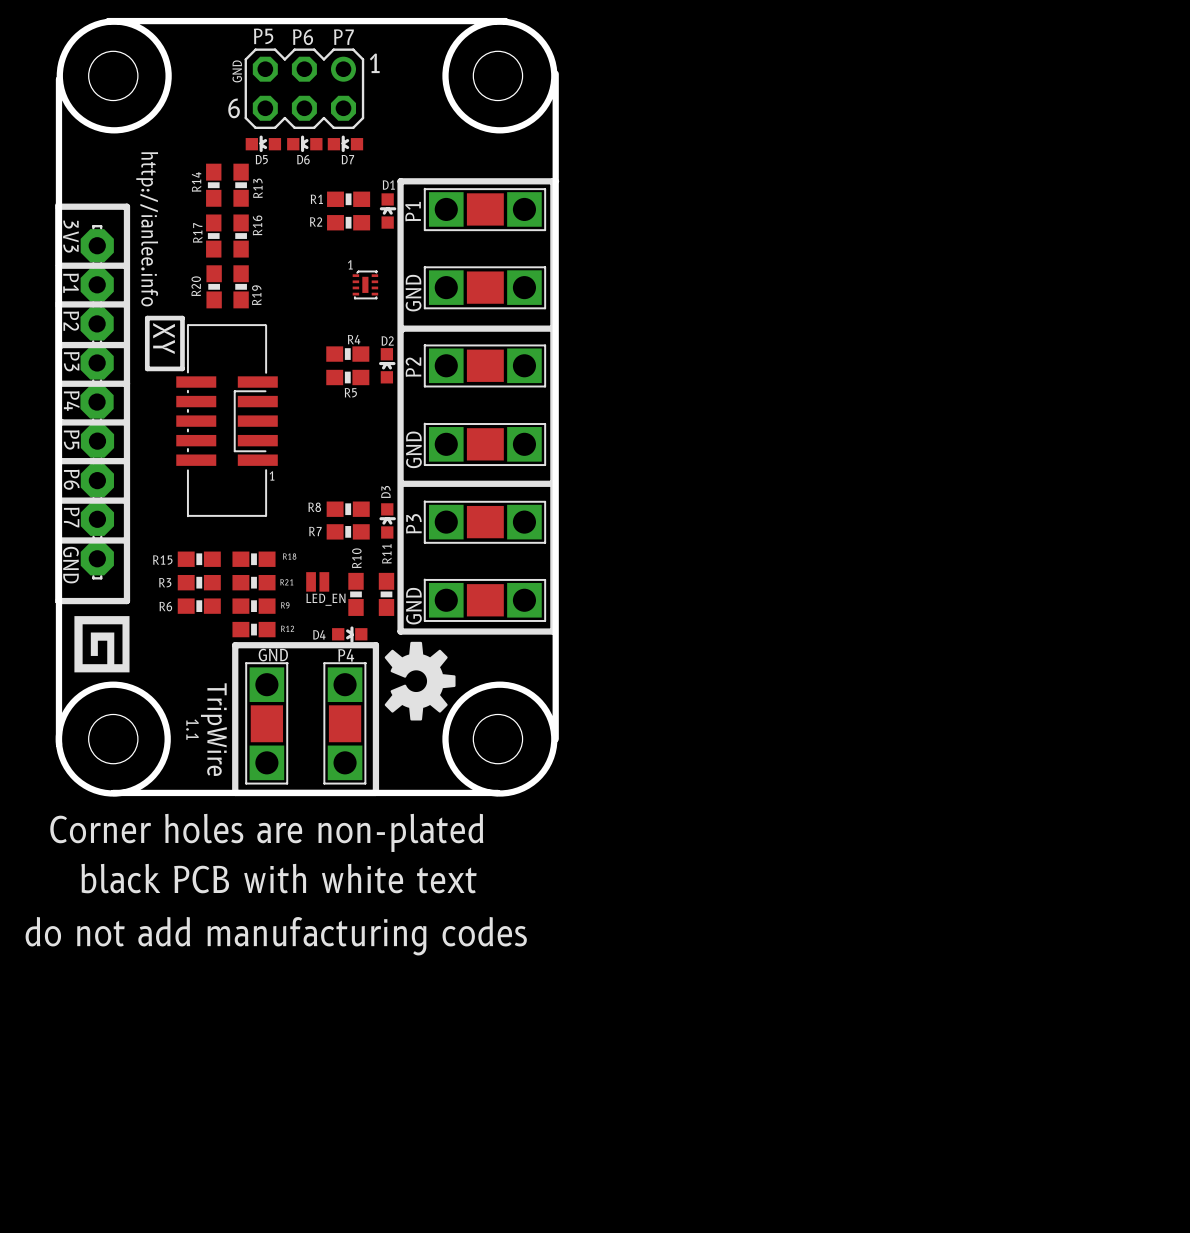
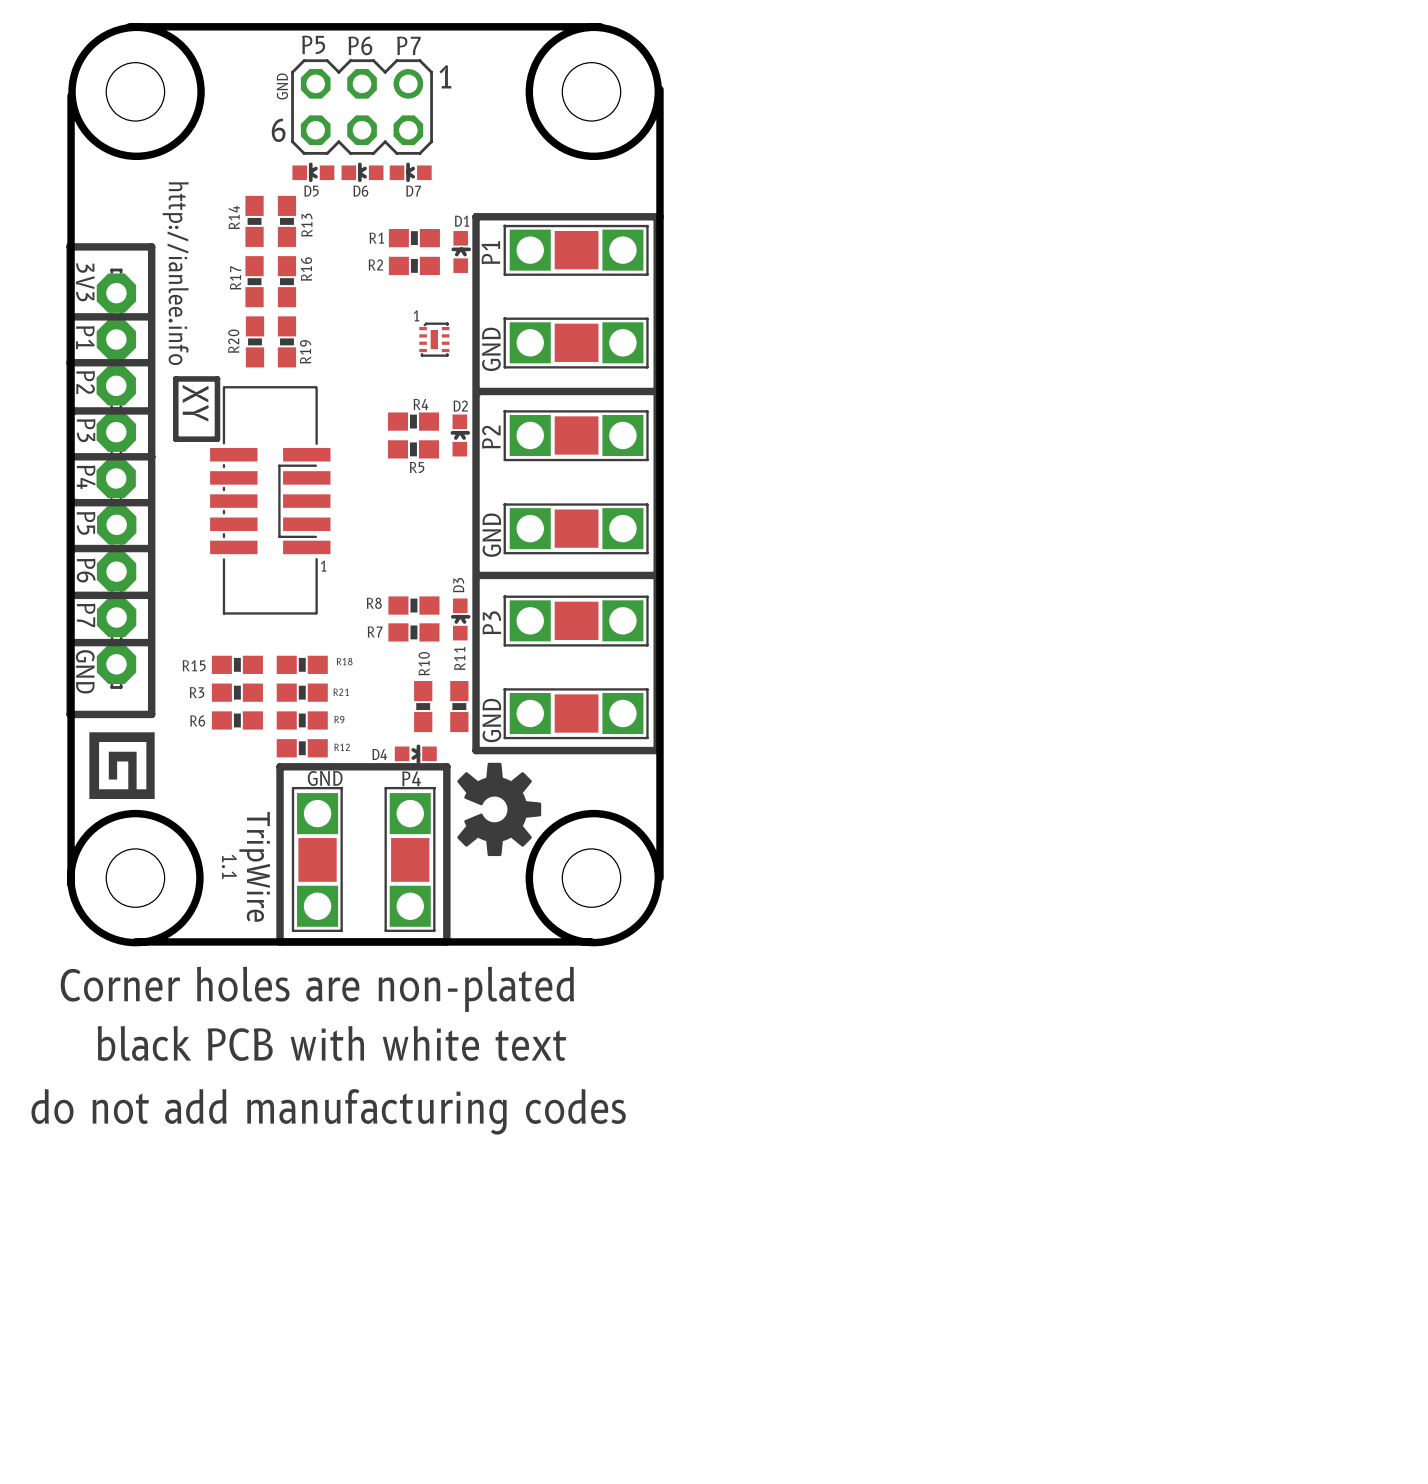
LED_EN: (317, 581) -> none

